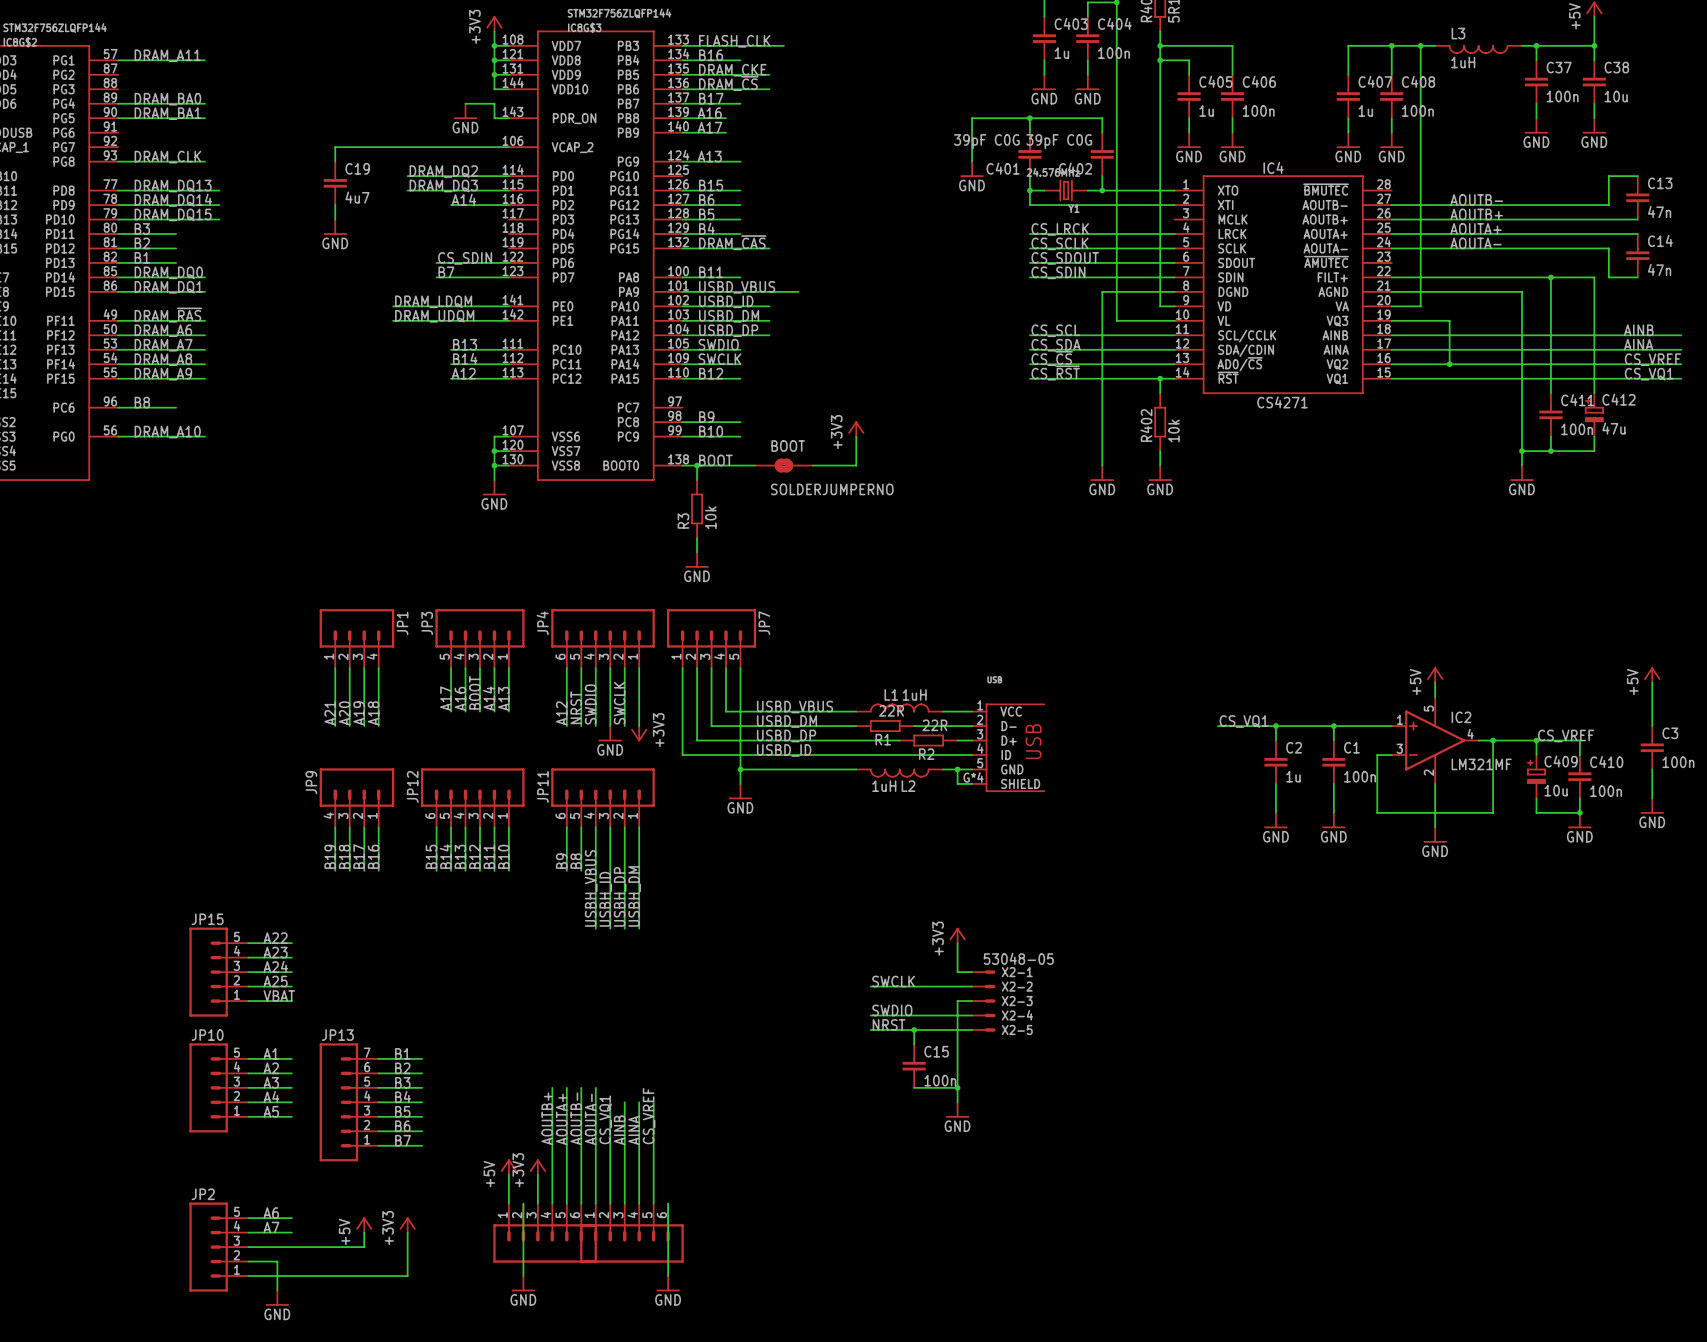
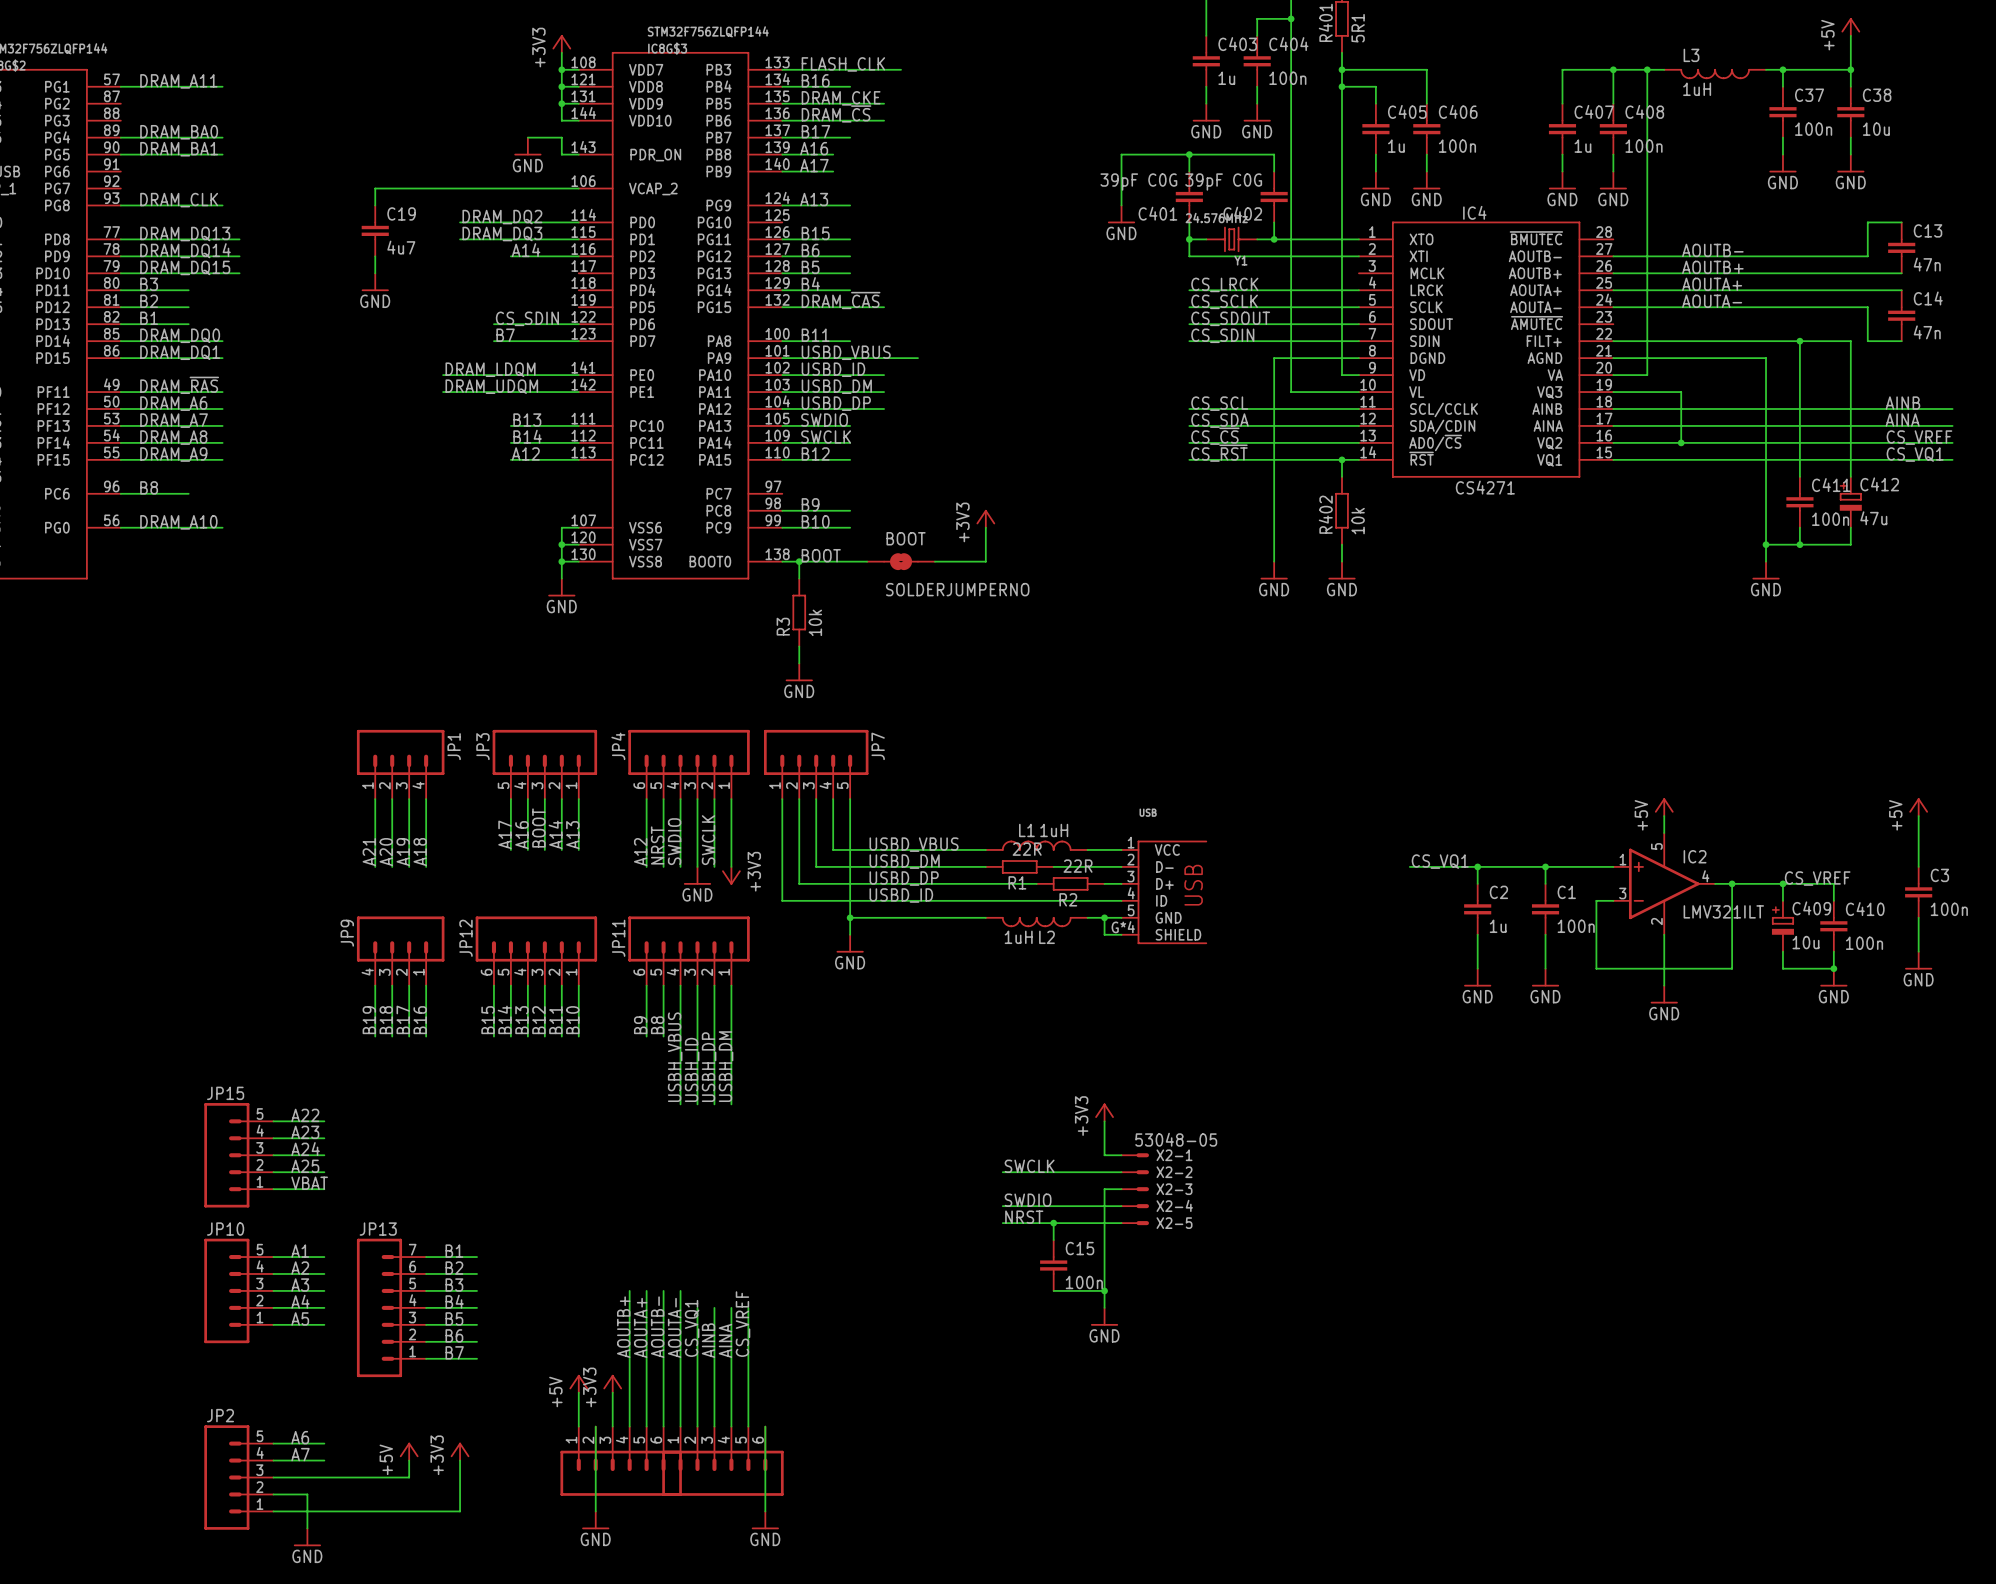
IC2 value: LM321MF (1481, 764) -> LMV321ILT (1723, 911)

